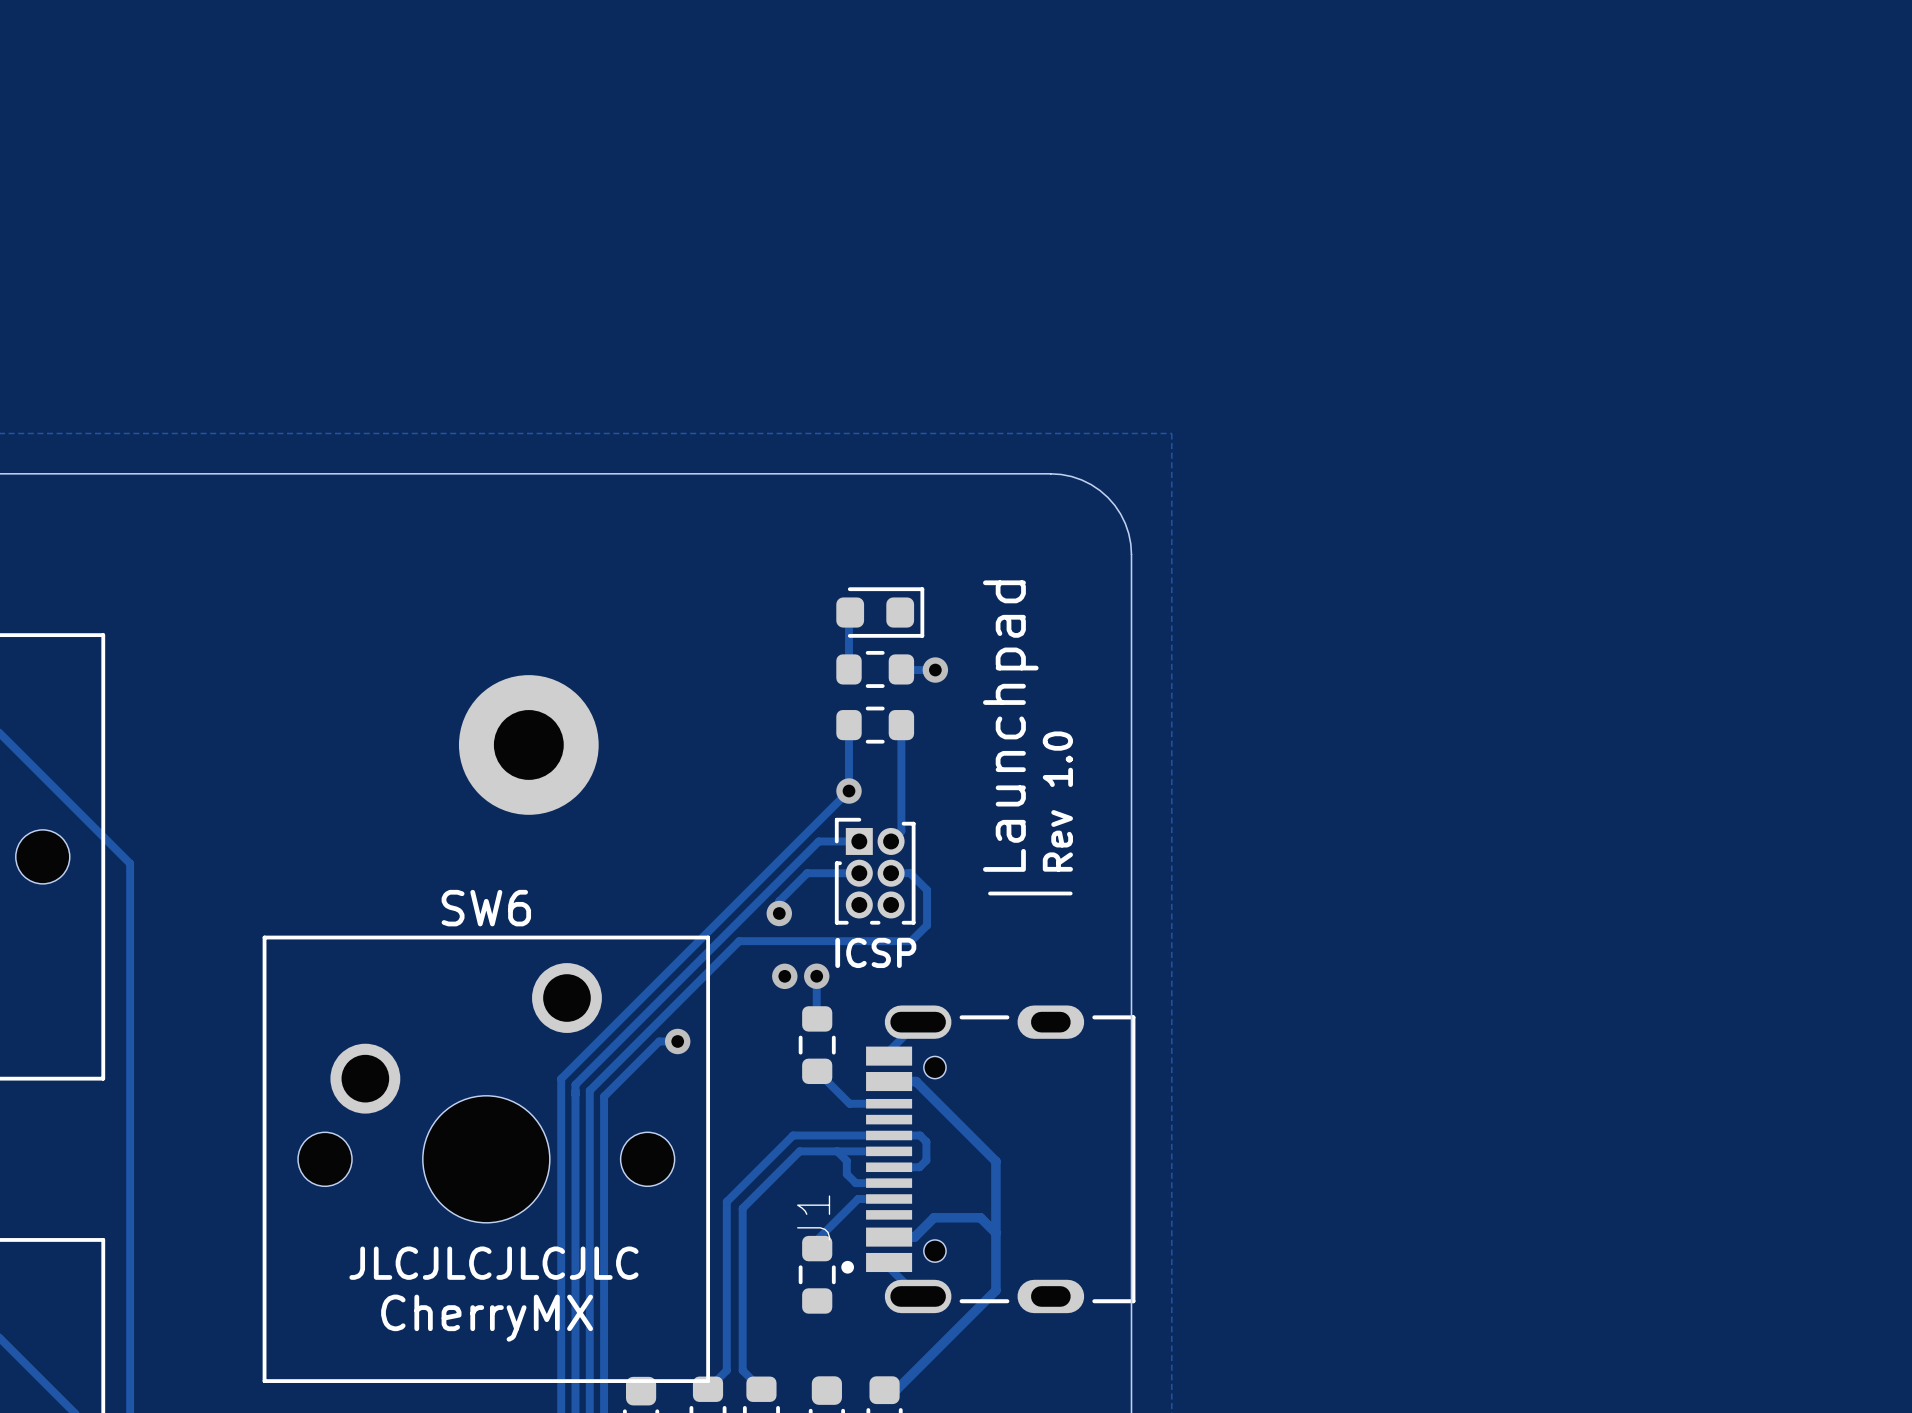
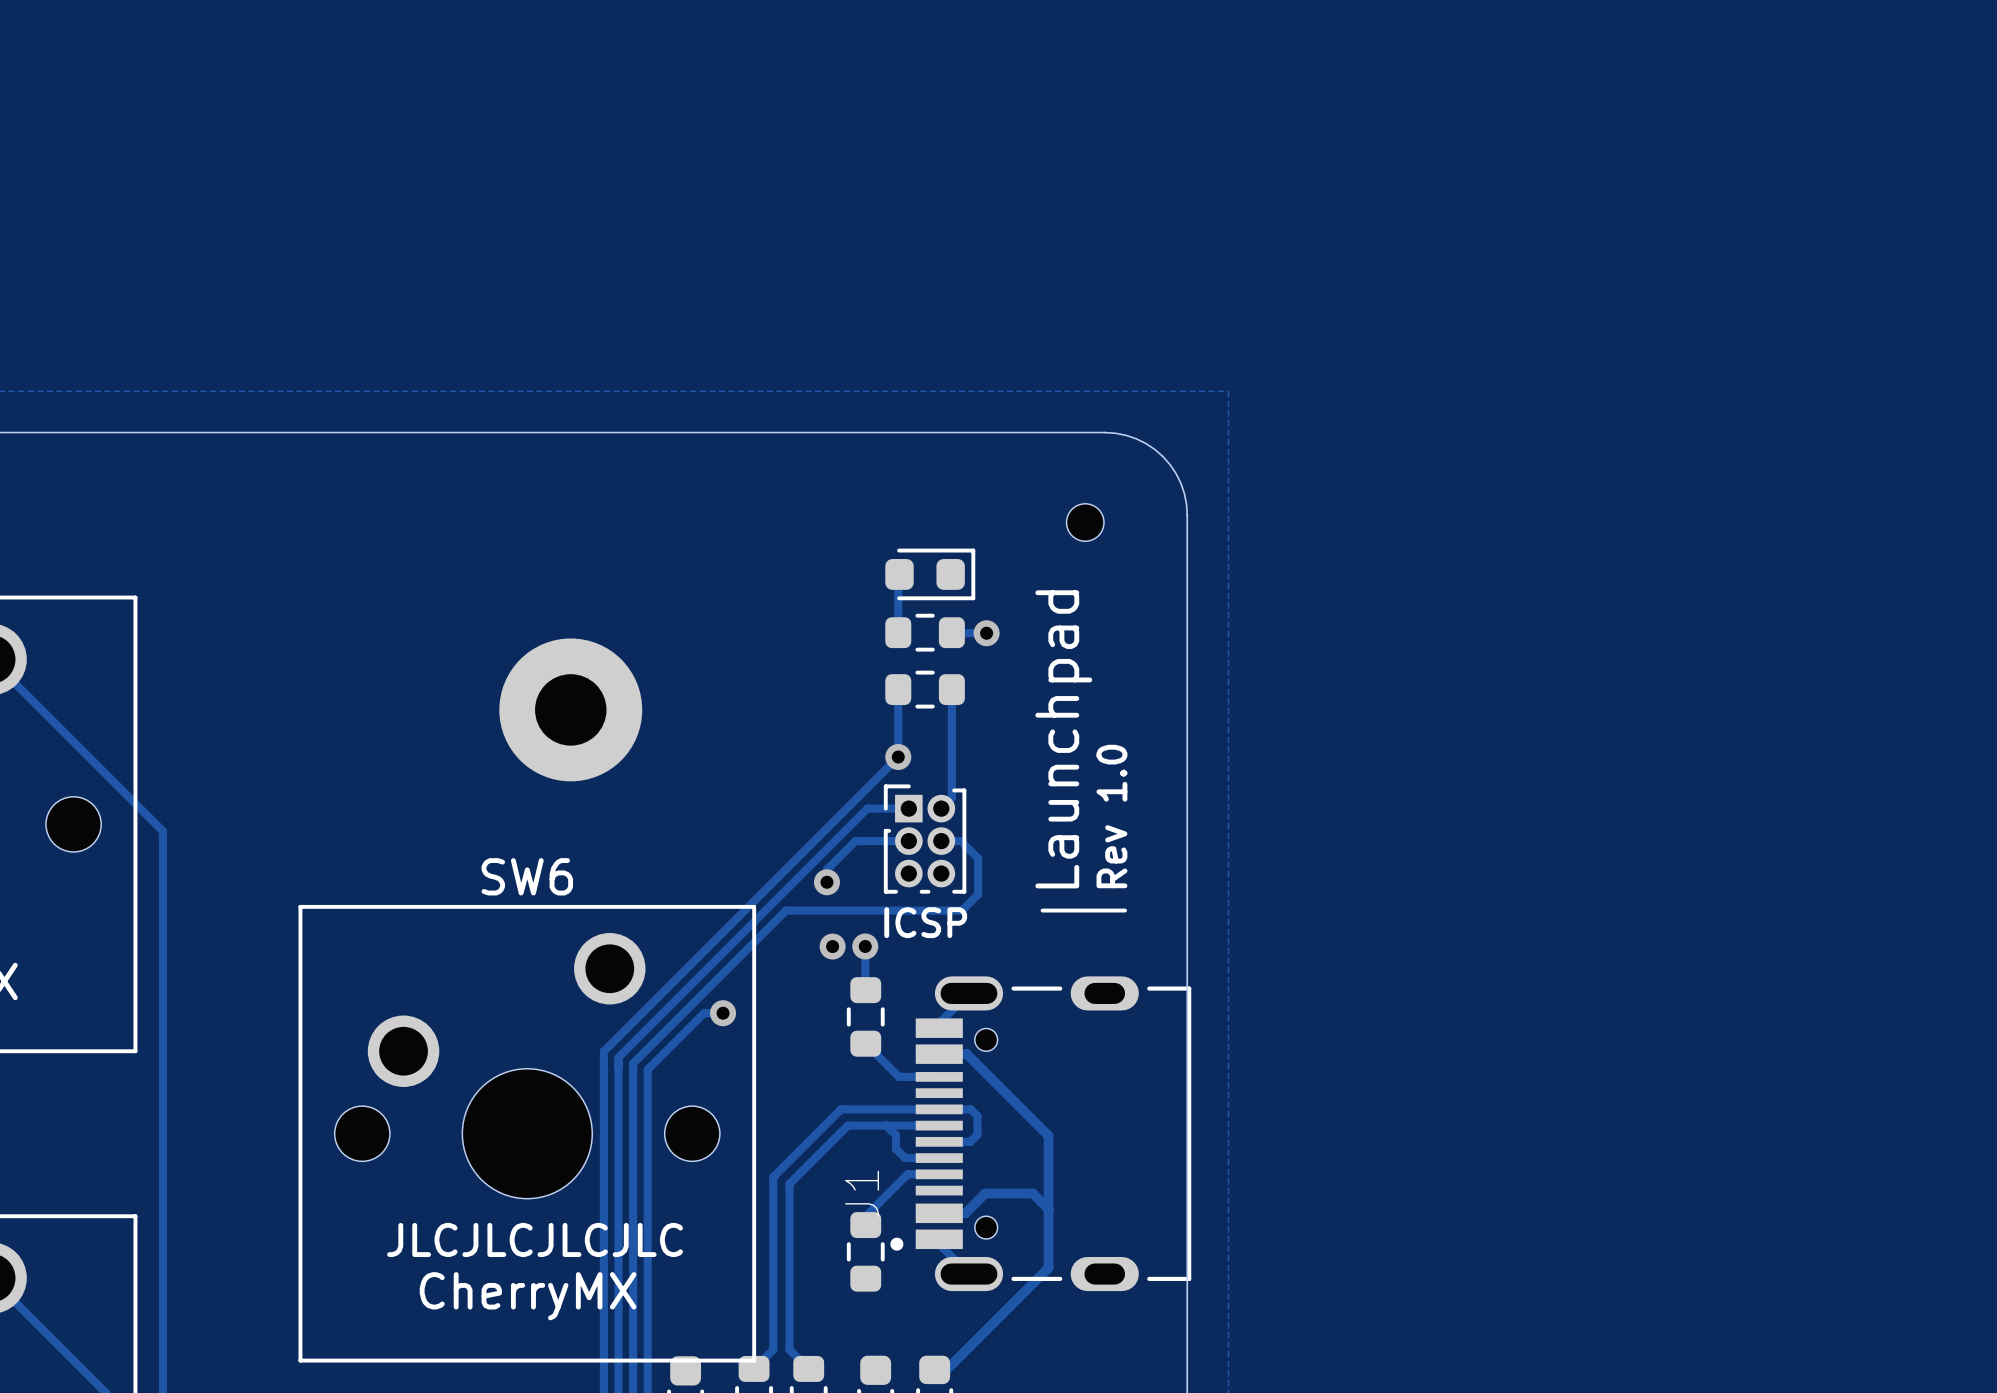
part: none -> (1085, 522)
text position: Launchpad (1010, 726) -> Launchpad (1063, 739)
text position: Rev 1.0 (1057, 801) -> Rev 1.0 (1111, 816)
line: (990, 893) (1070, 893) -> (1042, 910) (1125, 910)

